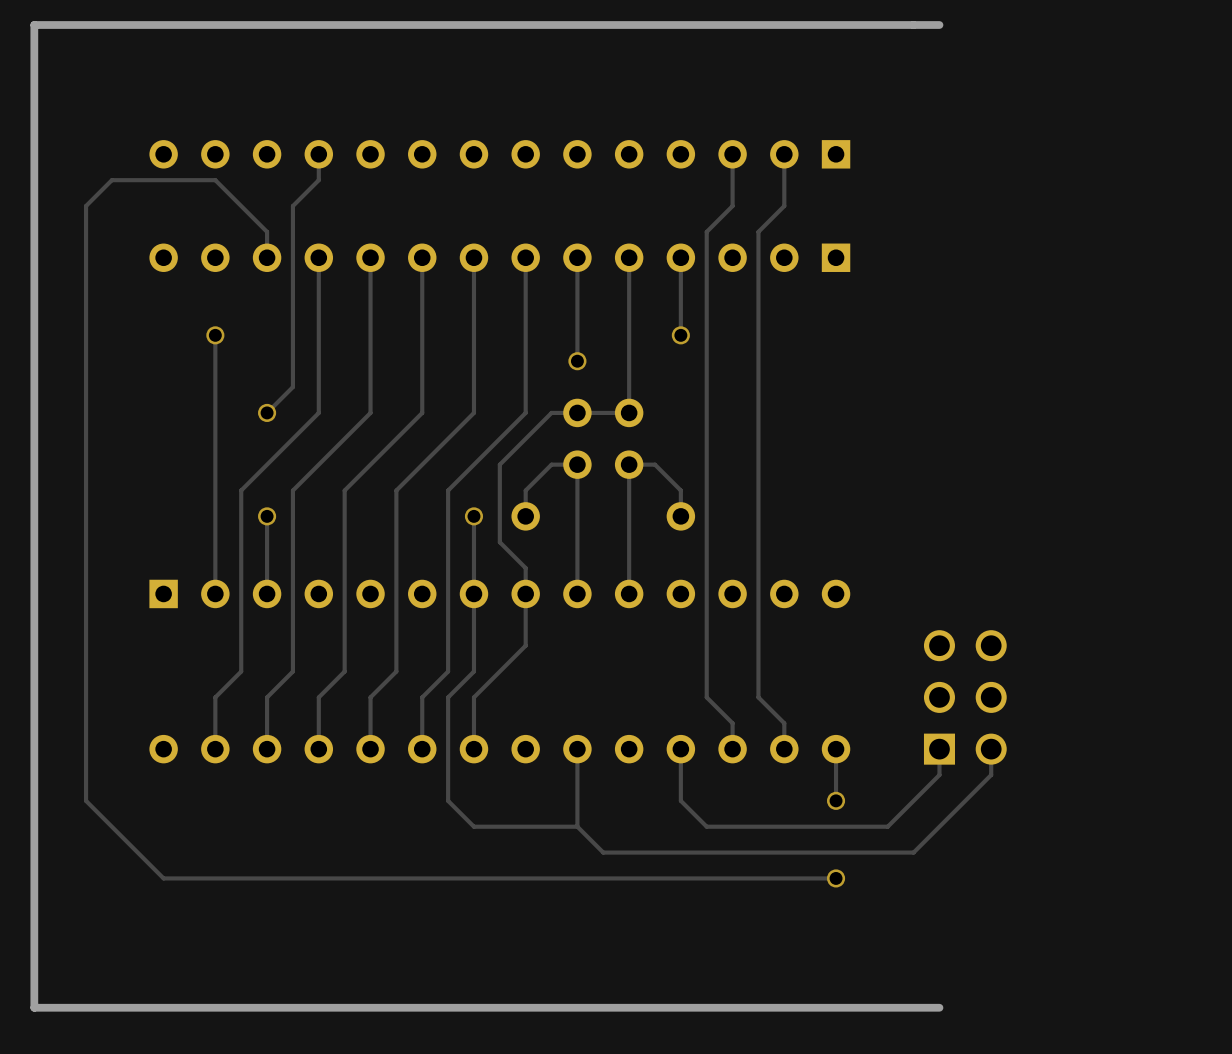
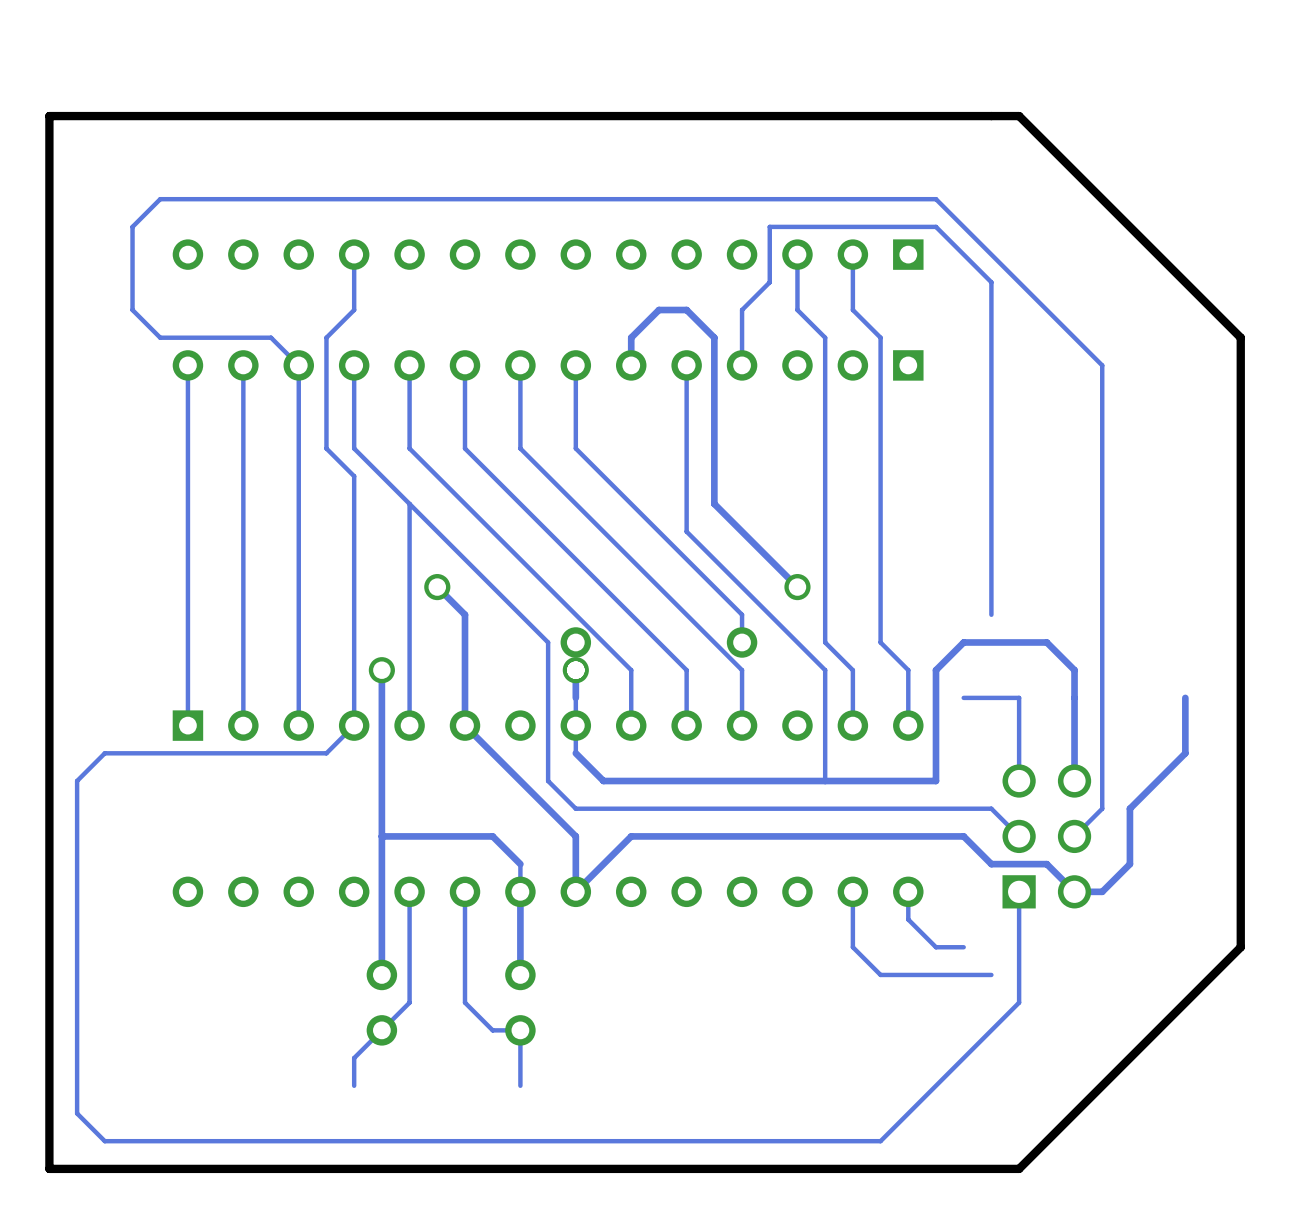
board edge: none -> (1019, 116) (1240, 337) (1240, 947) (1019, 1168)
track: (318, 180) (292, 206) (292, 231) -> (354, 282) (354, 310) (326, 337)
track: (732, 206) (706, 231) (706, 697) (732, 723) (732, 749) -> none
track: (784, 206) (758, 231) -> (797, 310) (825, 337)
track: none -> (852, 310) (880, 337) (880, 642) (908, 670) (908, 725)
track: none -> (187, 365) (187, 725)
track: none -> (243, 365) (243, 448)
track: (267, 257) (267, 231) (215, 180) (111, 180) (86, 206) (86, 800) (163, 878) (448, 878) -> (464, 891) (464, 1002) (492, 1030)
track: (577, 257) (577, 361) -> (631, 365) (631, 337) (658, 310) (686, 310) (714, 337) (714, 503) (797, 587)
track: (680, 257) (680, 335) -> (742, 365) (742, 310) (769, 282) (769, 226) (936, 226) (991, 282) (991, 614)
via: (215, 335) -> none
track: (292, 335) (292, 387) (267, 412) -> none
track: (318, 335) (318, 361) -> (326, 448) (354, 476)
track: none -> (354, 448) (548, 642)
track: (370, 335) (370, 387) -> none
track: (422, 335) (422, 412) (344, 490) (344, 542) -> (464, 448) (686, 670)
track: (473, 335) (473, 412) (396, 490) (396, 671) (370, 697) (370, 749) -> (520, 448) (742, 670) (742, 725)
track: (525, 335) (525, 412) (448, 490) (448, 671) (422, 697) (422, 749) -> none
via: (680, 335) -> none
via: (577, 361) -> none
via: (267, 412) -> none
track: (318, 412) (241, 490) (241, 671) (215, 697) (215, 749) -> (354, 531) (354, 725) (326, 753) (104, 753) (77, 781) (77, 1113) (104, 1141) (880, 1141) (1019, 1002) (1019, 919)
track: (370, 412) (292, 490) (292, 671) (267, 697) (267, 749) -> (409, 531) (409, 725)
track: (629, 412) (551, 412) (499, 464) (499, 516) -> (686, 531) (825, 670)
part: (577, 438) -> none
part: (629, 438) -> none
track: none -> (437, 587) (464, 614) (464, 725) (575, 836) (575, 891) (631, 836) (963, 836) (991, 864) (1046, 864) (1074, 891) (1102, 891) (1129, 864) (1129, 808) (1185, 753) (1185, 697)
via: none -> (437, 587)
track: (655, 464) (629, 464) (629, 542) -> (714, 587) (575, 448)
via: none -> (797, 587)
track: none -> (298, 642) (298, 365) (271, 337) (160, 337) (132, 310) (132, 226) (160, 199) (936, 199) (1102, 365) (1102, 808) (1074, 836)
via: (267, 516) -> none
track: (473, 516) (473, 671) (448, 697) (448, 800) (473, 826) (577, 826) -> none
via: (473, 516) -> none
track: (525, 516) (525, 490) (551, 464) (577, 464) (577, 542) -> (409, 448) (631, 670)
track: (758, 516) (758, 542) -> (825, 642) (852, 670) (852, 725)
via: none -> (381, 670)
track: (499, 542) (525, 568) -> (575, 670) (575, 697)
track: none -> (548, 670) (548, 781) (575, 808) (991, 808) (1019, 836)
via: none -> (575, 670)
via: none -> (575, 670)
track: none -> (963, 697) (1019, 697) (1019, 781)
track: (525, 619) (525, 645) (473, 697) (473, 723) -> (381, 836) (492, 836) (520, 864)
track: none -> (575, 753) (603, 781) (936, 781) (936, 670) (963, 642) (1046, 642) (1074, 670) (1074, 781)
track: (758, 645) (758, 697) (784, 723) (784, 749) -> none
track: (344, 671) (318, 697) (318, 749) -> (381, 808) (381, 974) (381, 670)
track: none -> (409, 891) (409, 1002) (354, 1058) (354, 1085)
track: (577, 749) (577, 826) -> (520, 891) (520, 974)
track: (680, 749) (680, 800) (706, 826) (810, 826) -> (852, 891) (852, 947) (880, 974)
track: (991, 749) (991, 774) (913, 852) (603, 852) (577, 826) -> none
track: (836, 774) (836, 800) -> (908, 919) (936, 947) (963, 947)
track: (939, 774) (887, 826) -> (991, 974) (963, 974)
via: (836, 800) -> none
part: none -> (381, 1002)
part: none -> (520, 1002)
track: (836, 878) (473, 878) -> (520, 1085) (520, 1030)
via: (836, 878) -> none

